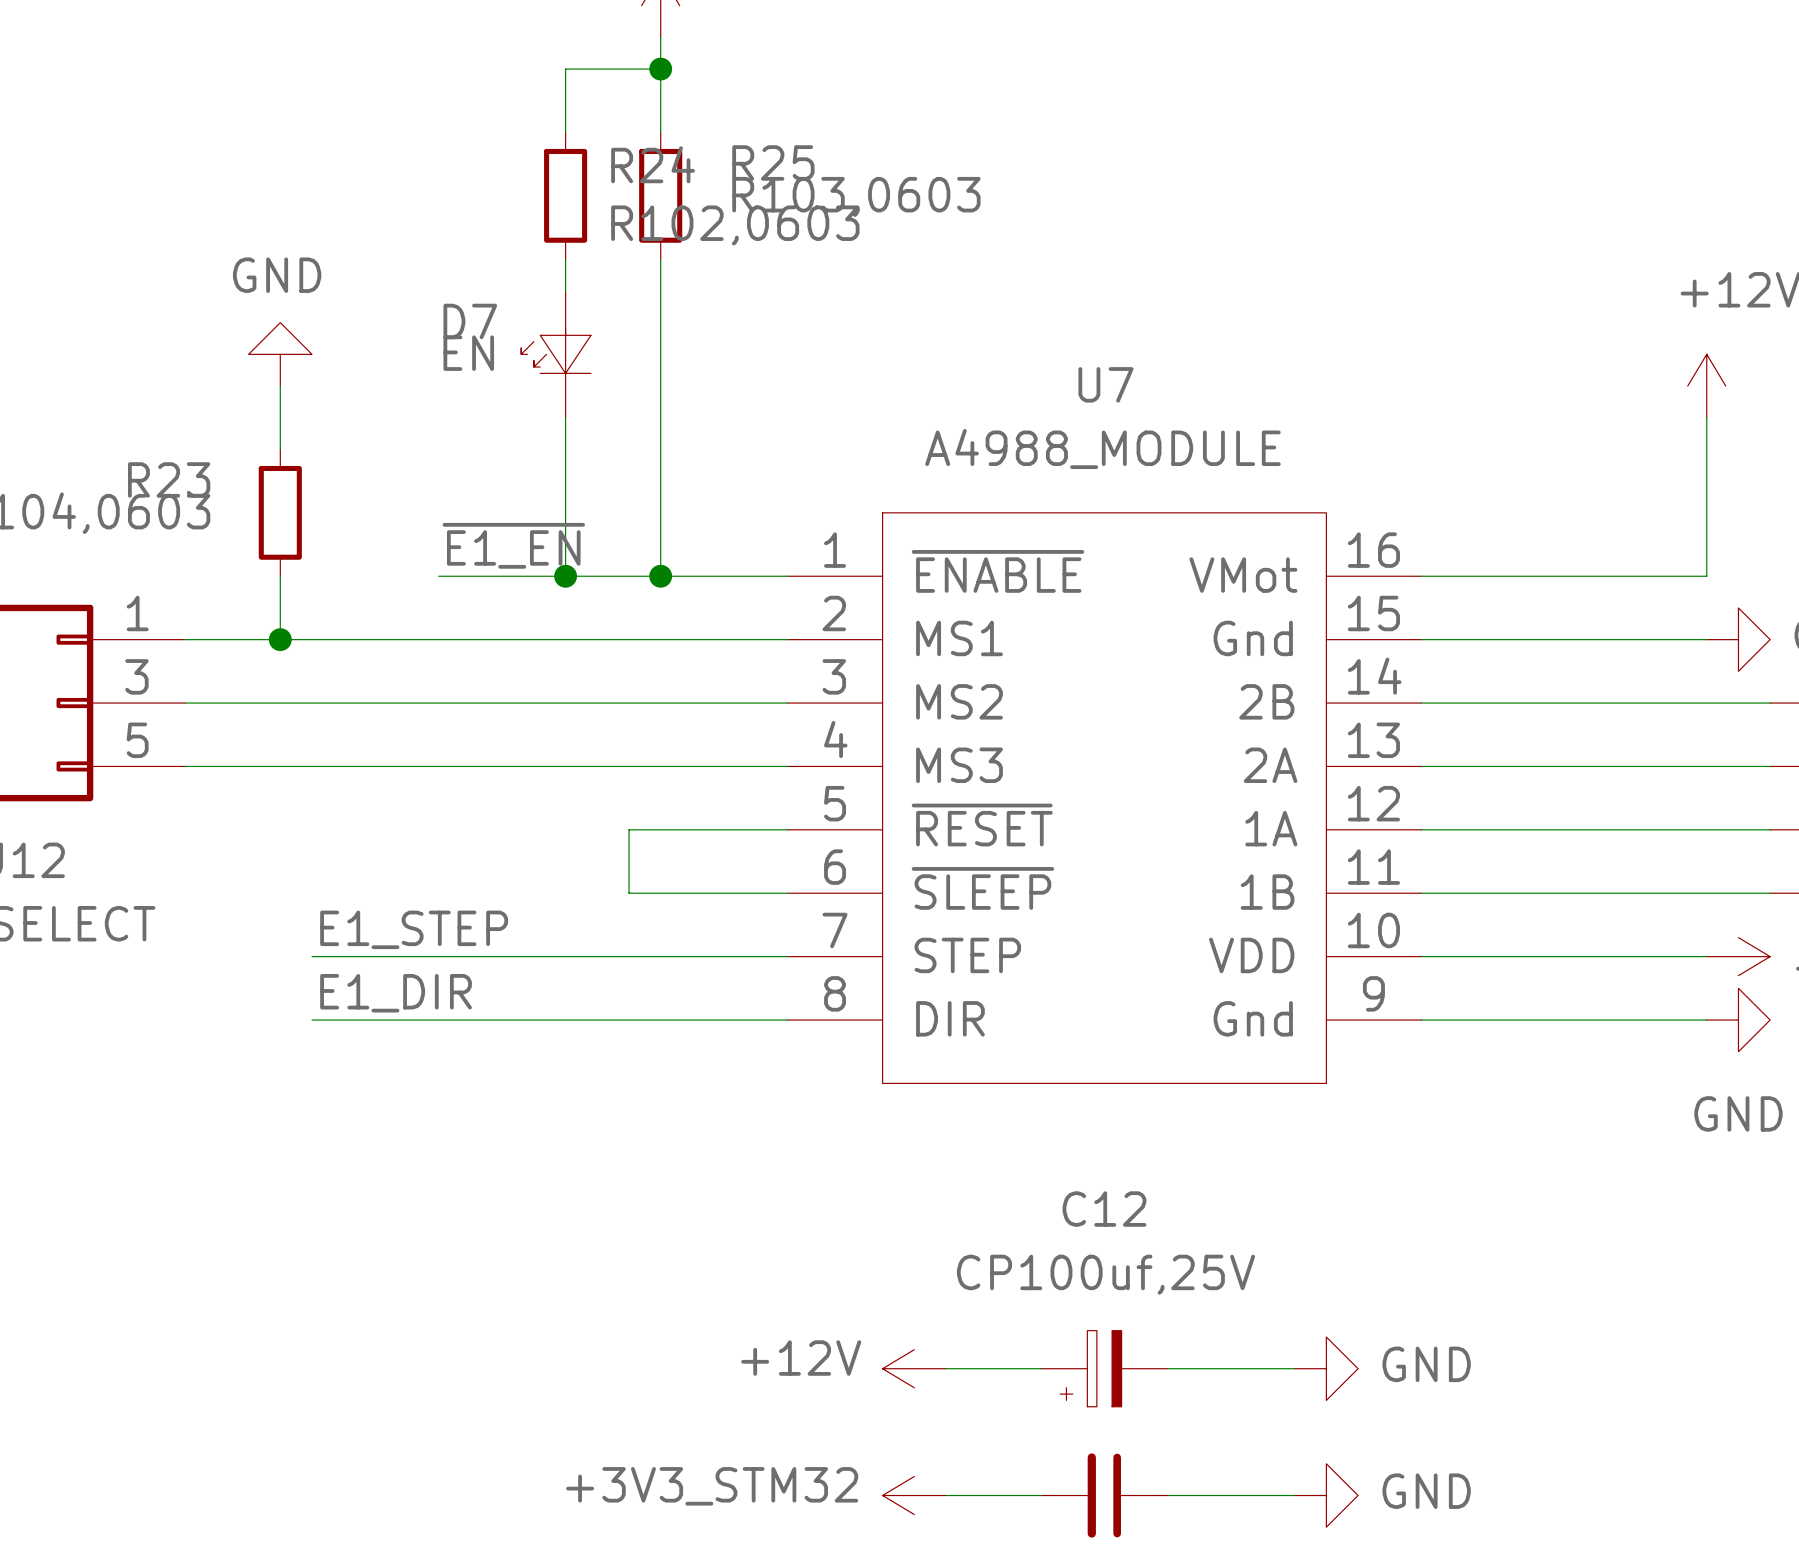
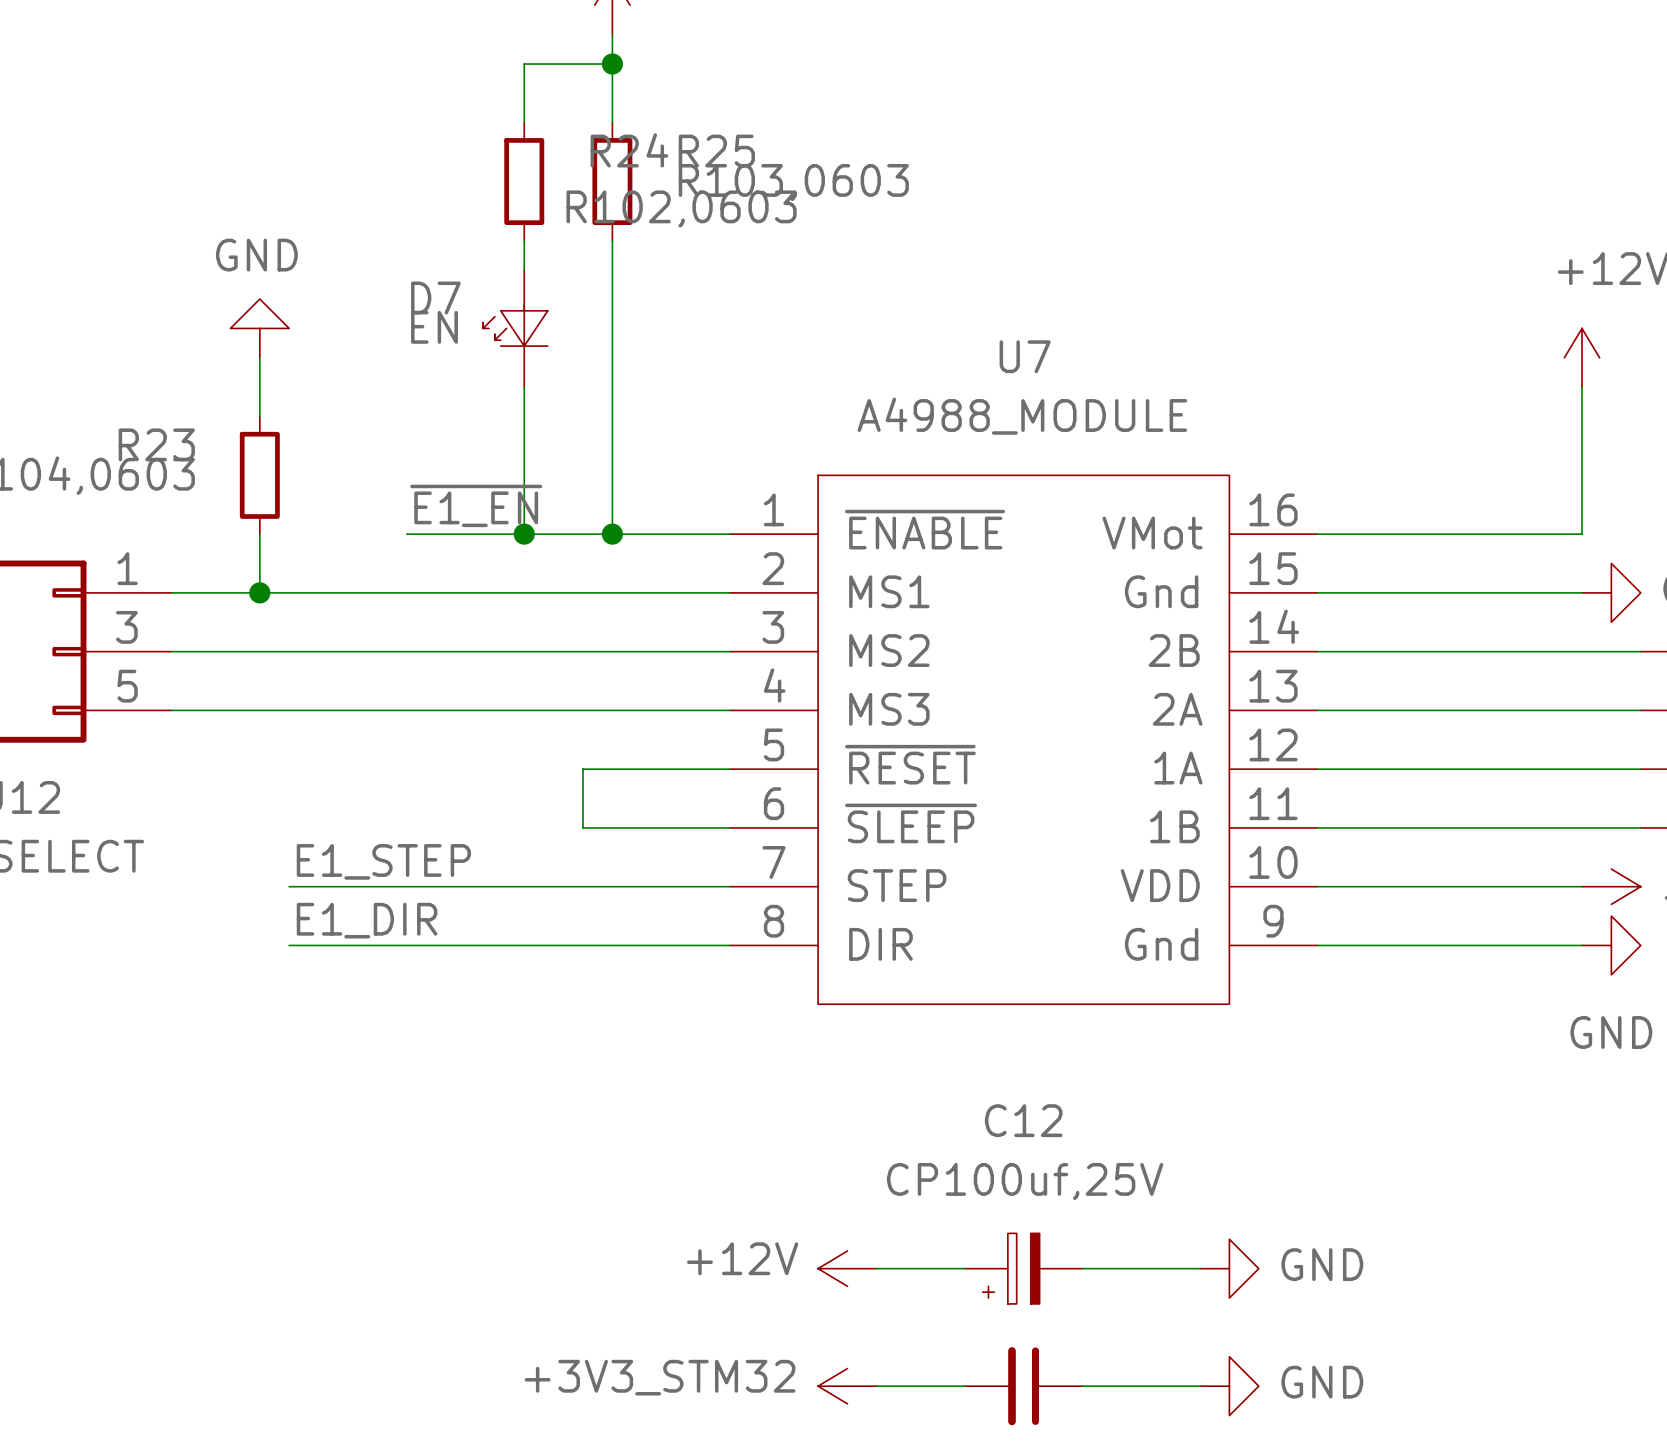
R24 name position: R24 (653, 164) -> R24 (629, 150)

